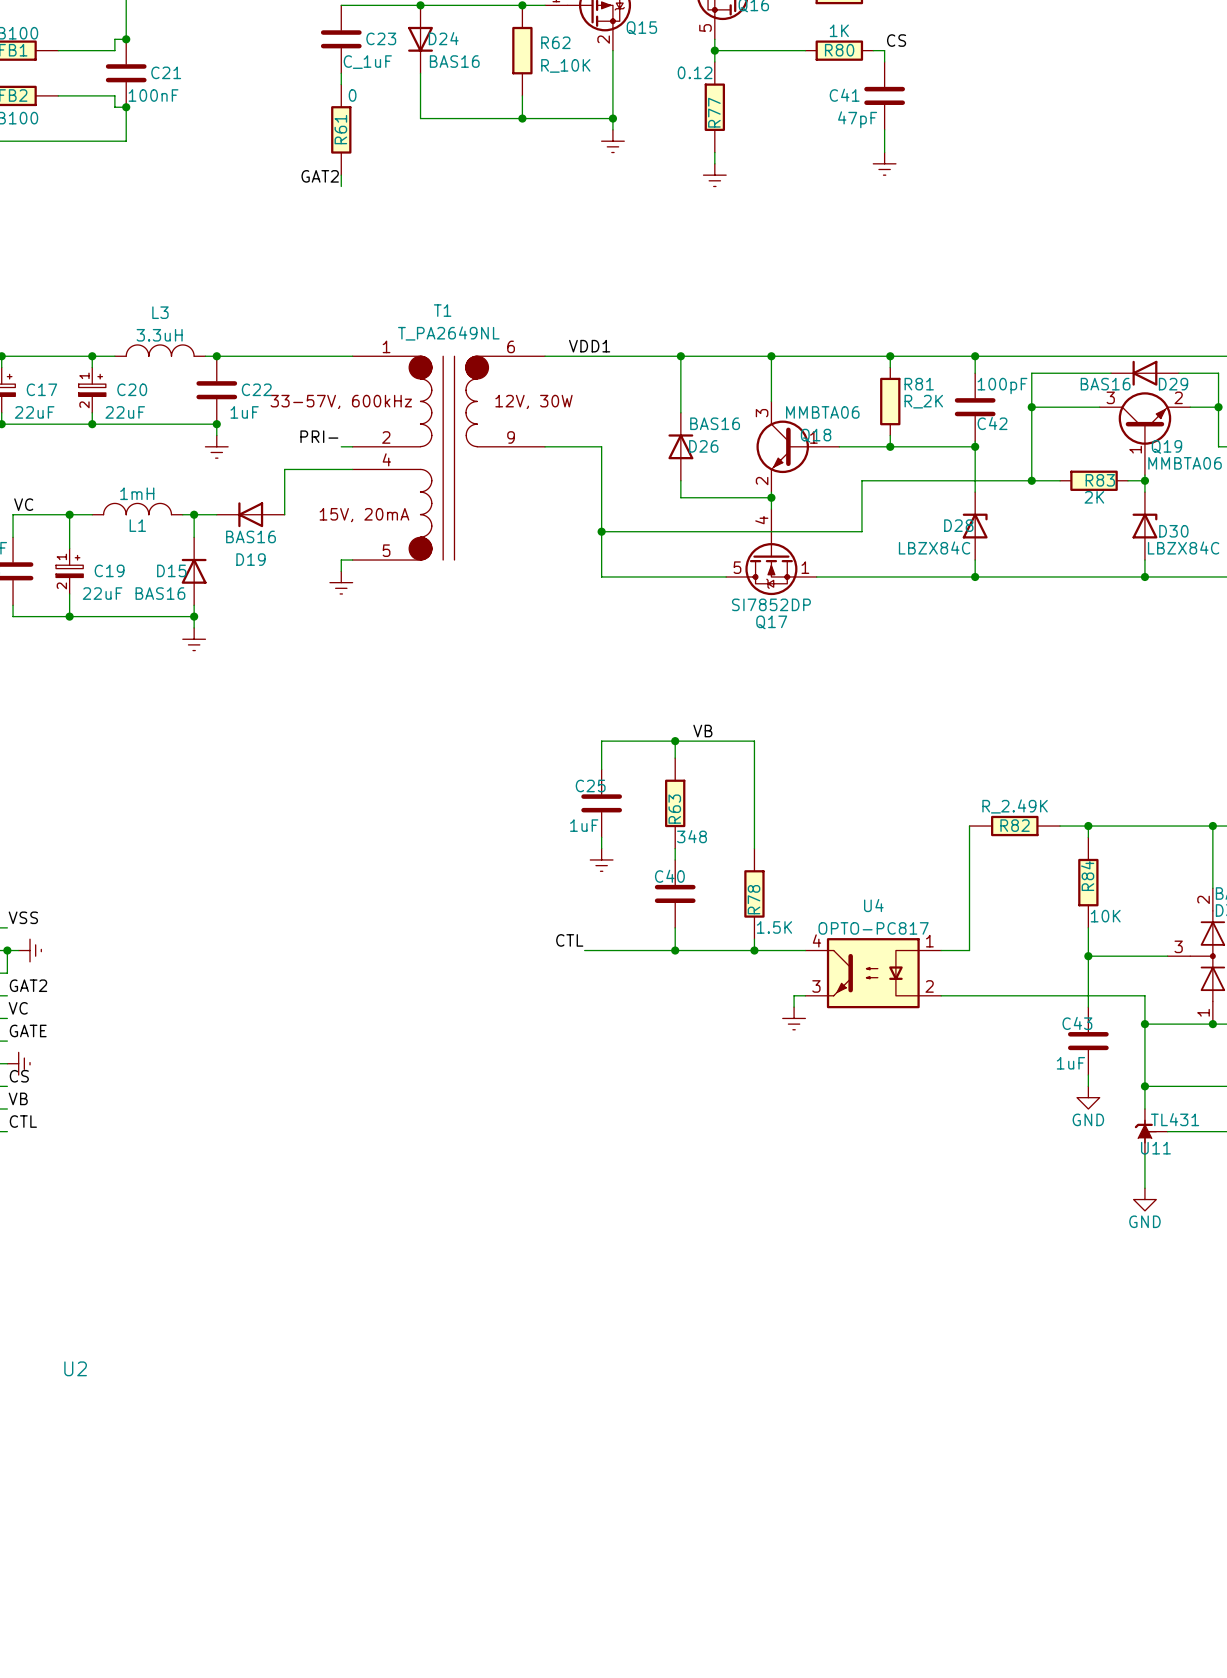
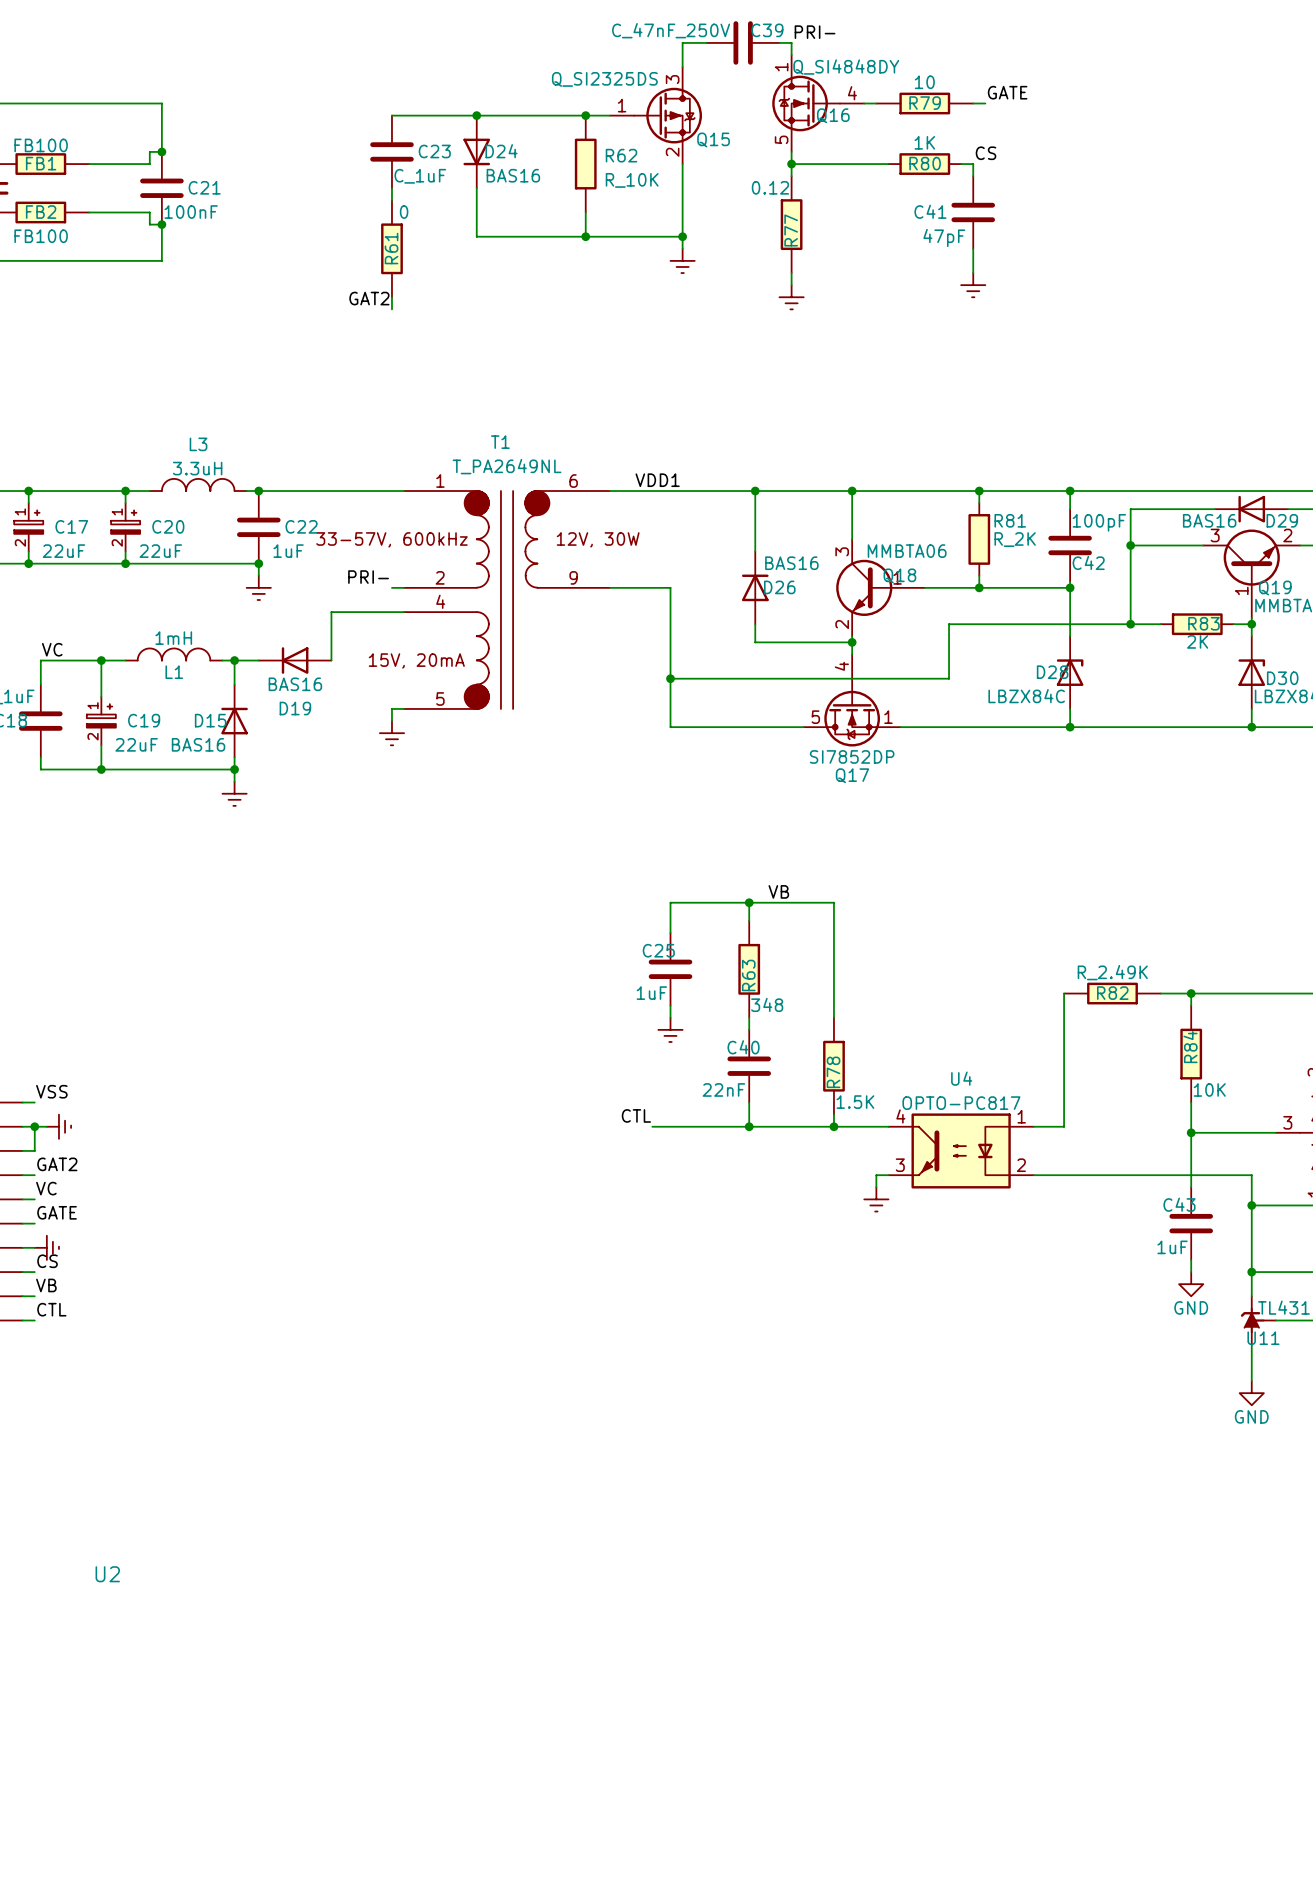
C40 value: none -> 22nF (723, 1089)

